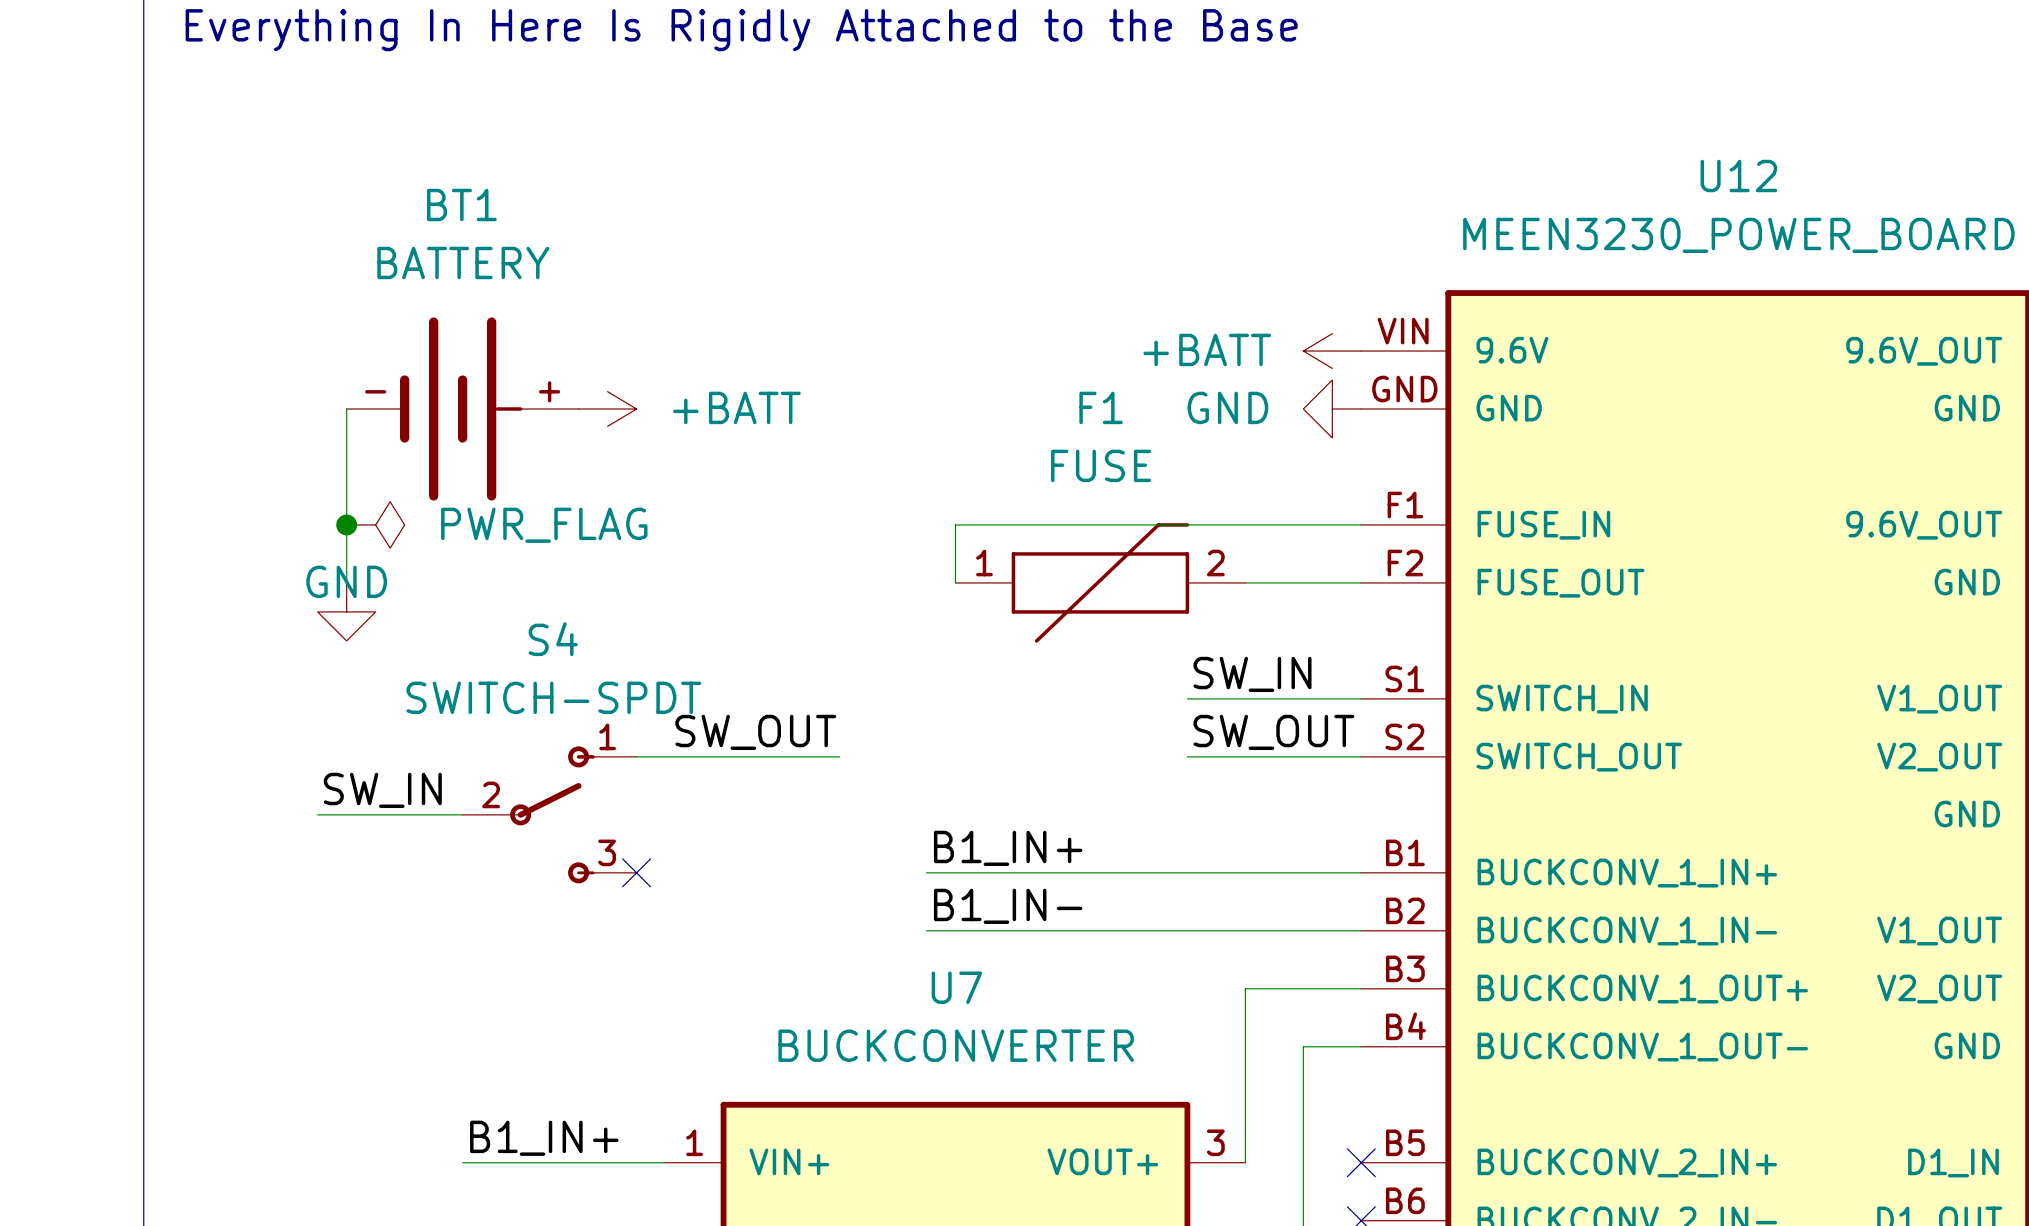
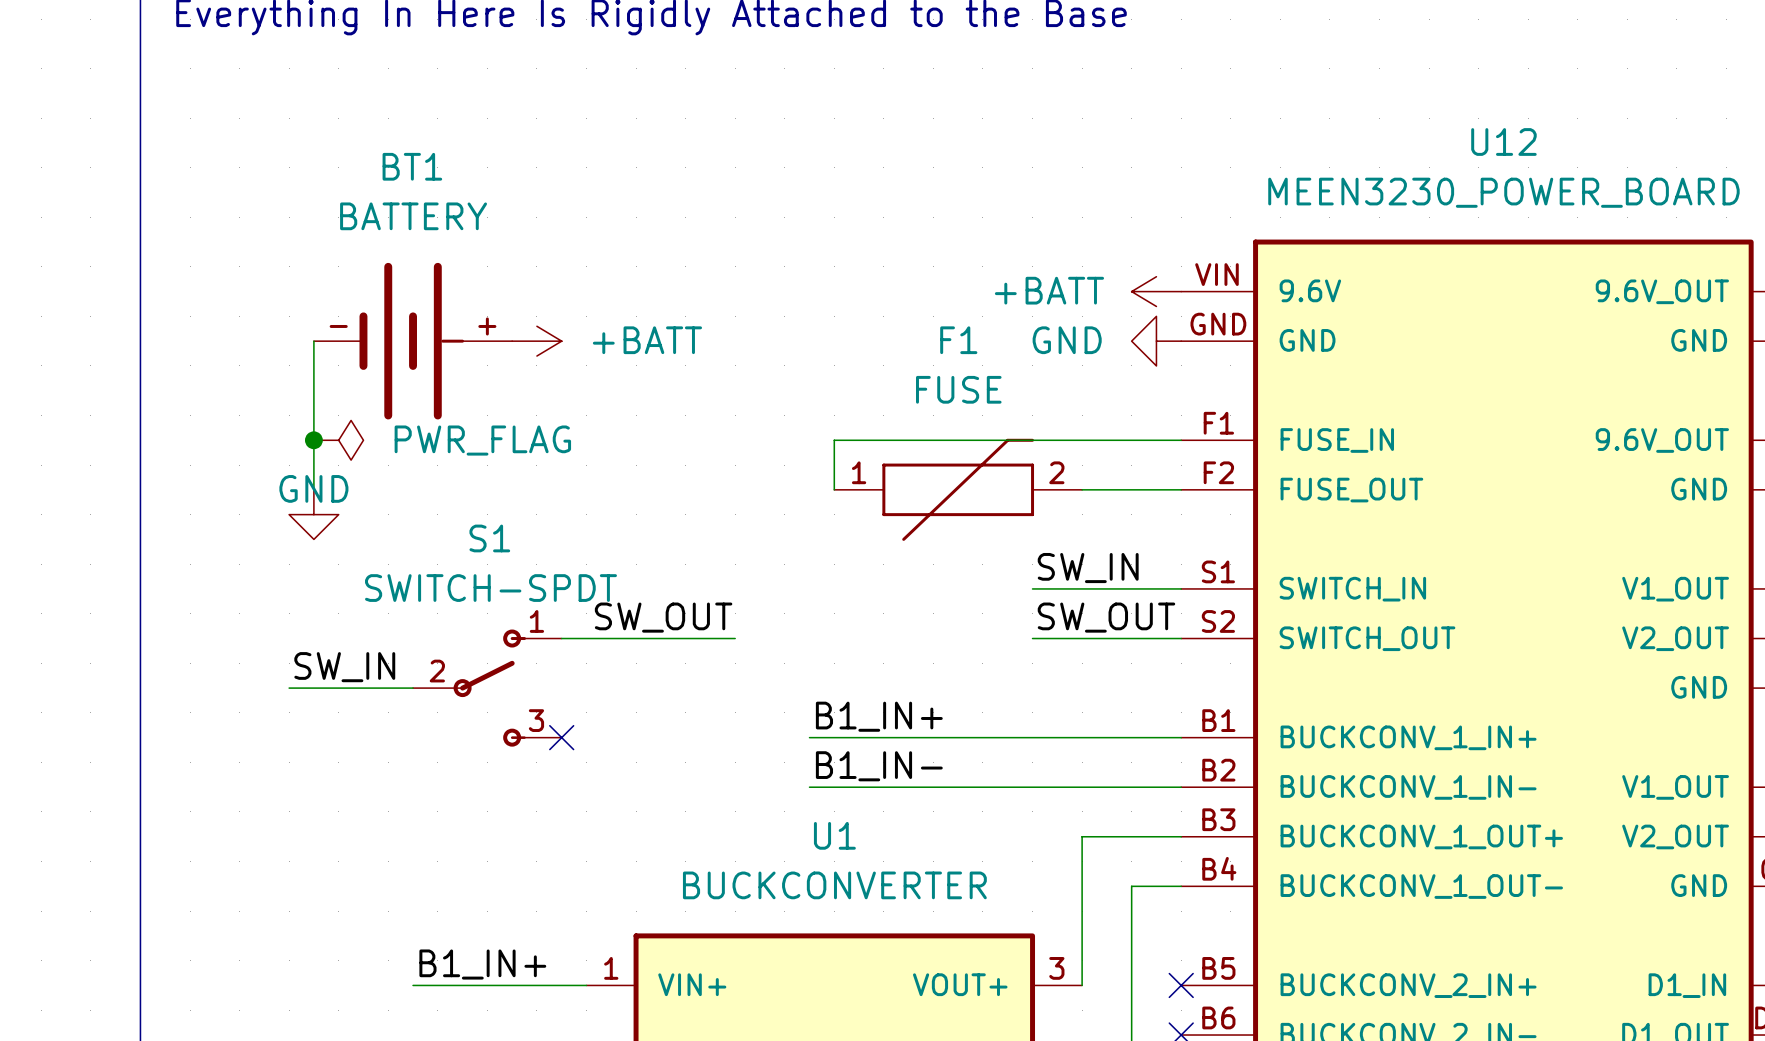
S4 name: S4 (553, 639) -> S1 (489, 538)
U7 name: U7 (956, 987) -> U1 (834, 835)

